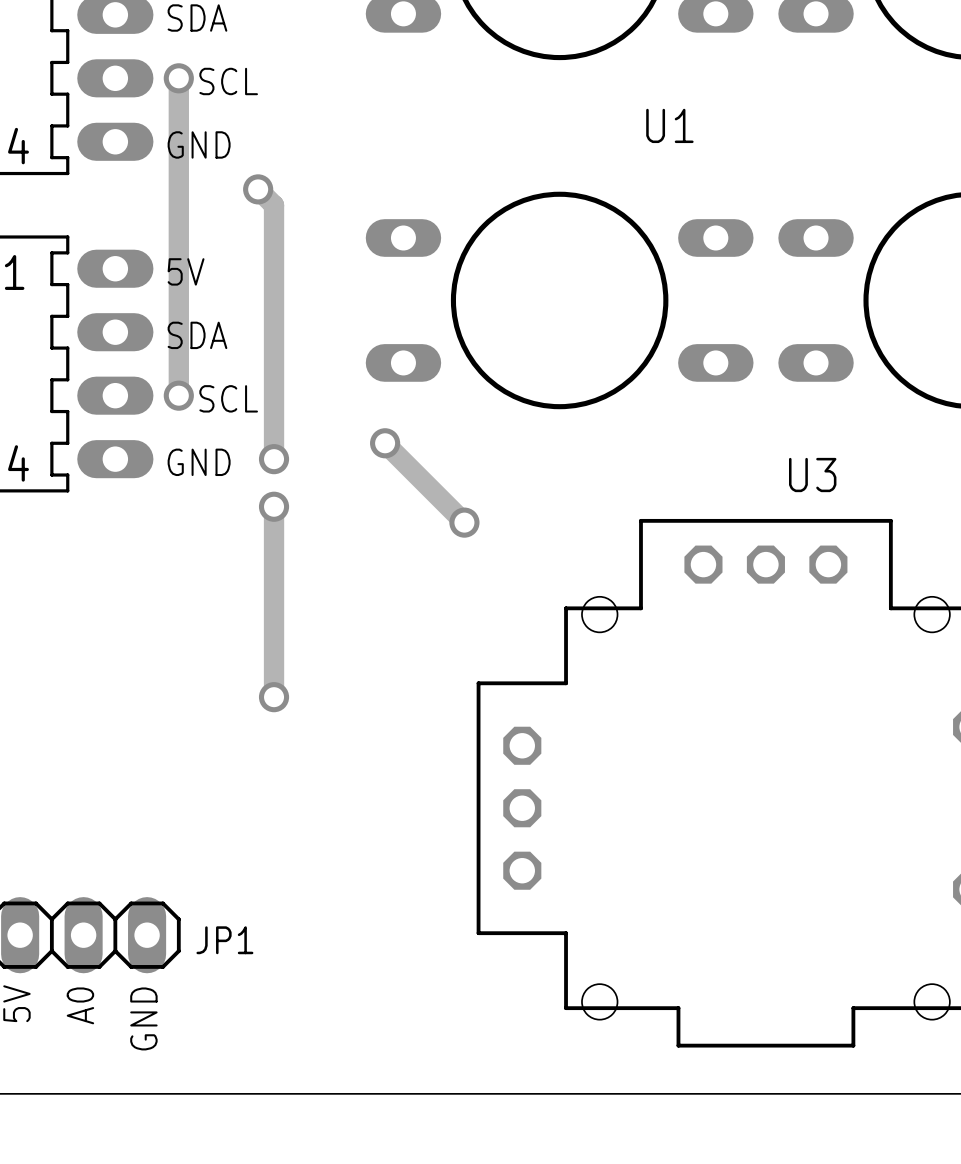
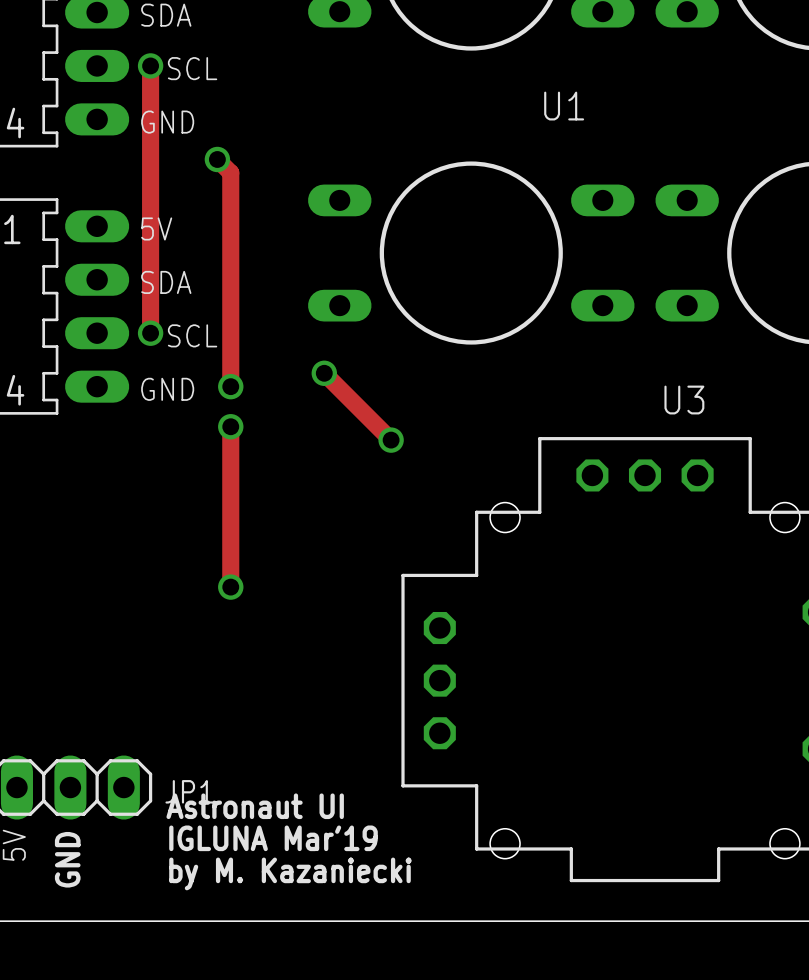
text: none -> Astronaut UI (255, 806)
text: none -> IGLUNA Mar'19 (273, 838)
text: A0 (80, 1005) -> GND (67, 859)
text: GND (143, 1018) -> none
text: none -> by M. Kazaniecki (290, 873)

